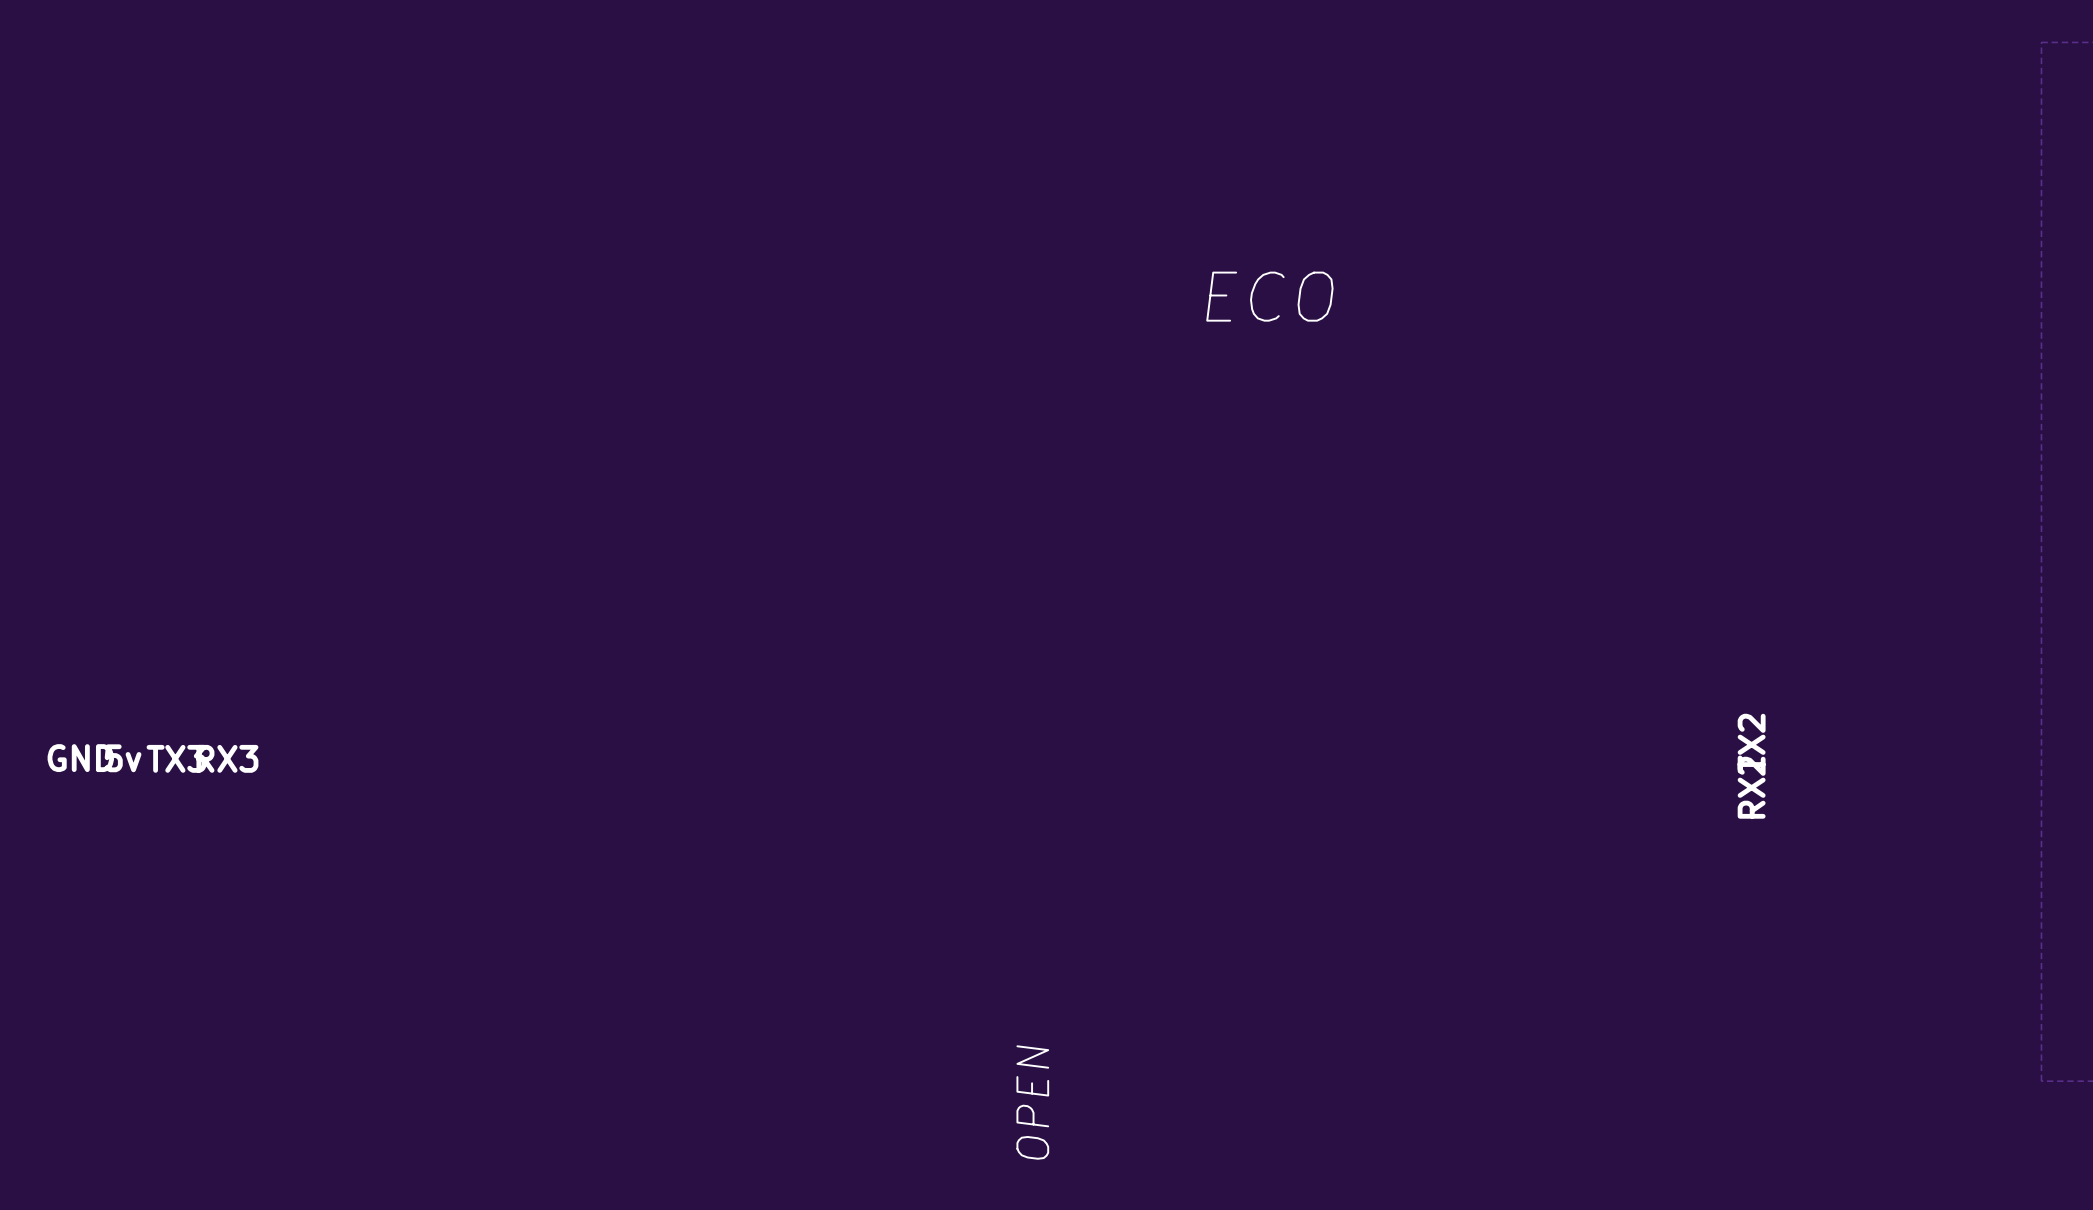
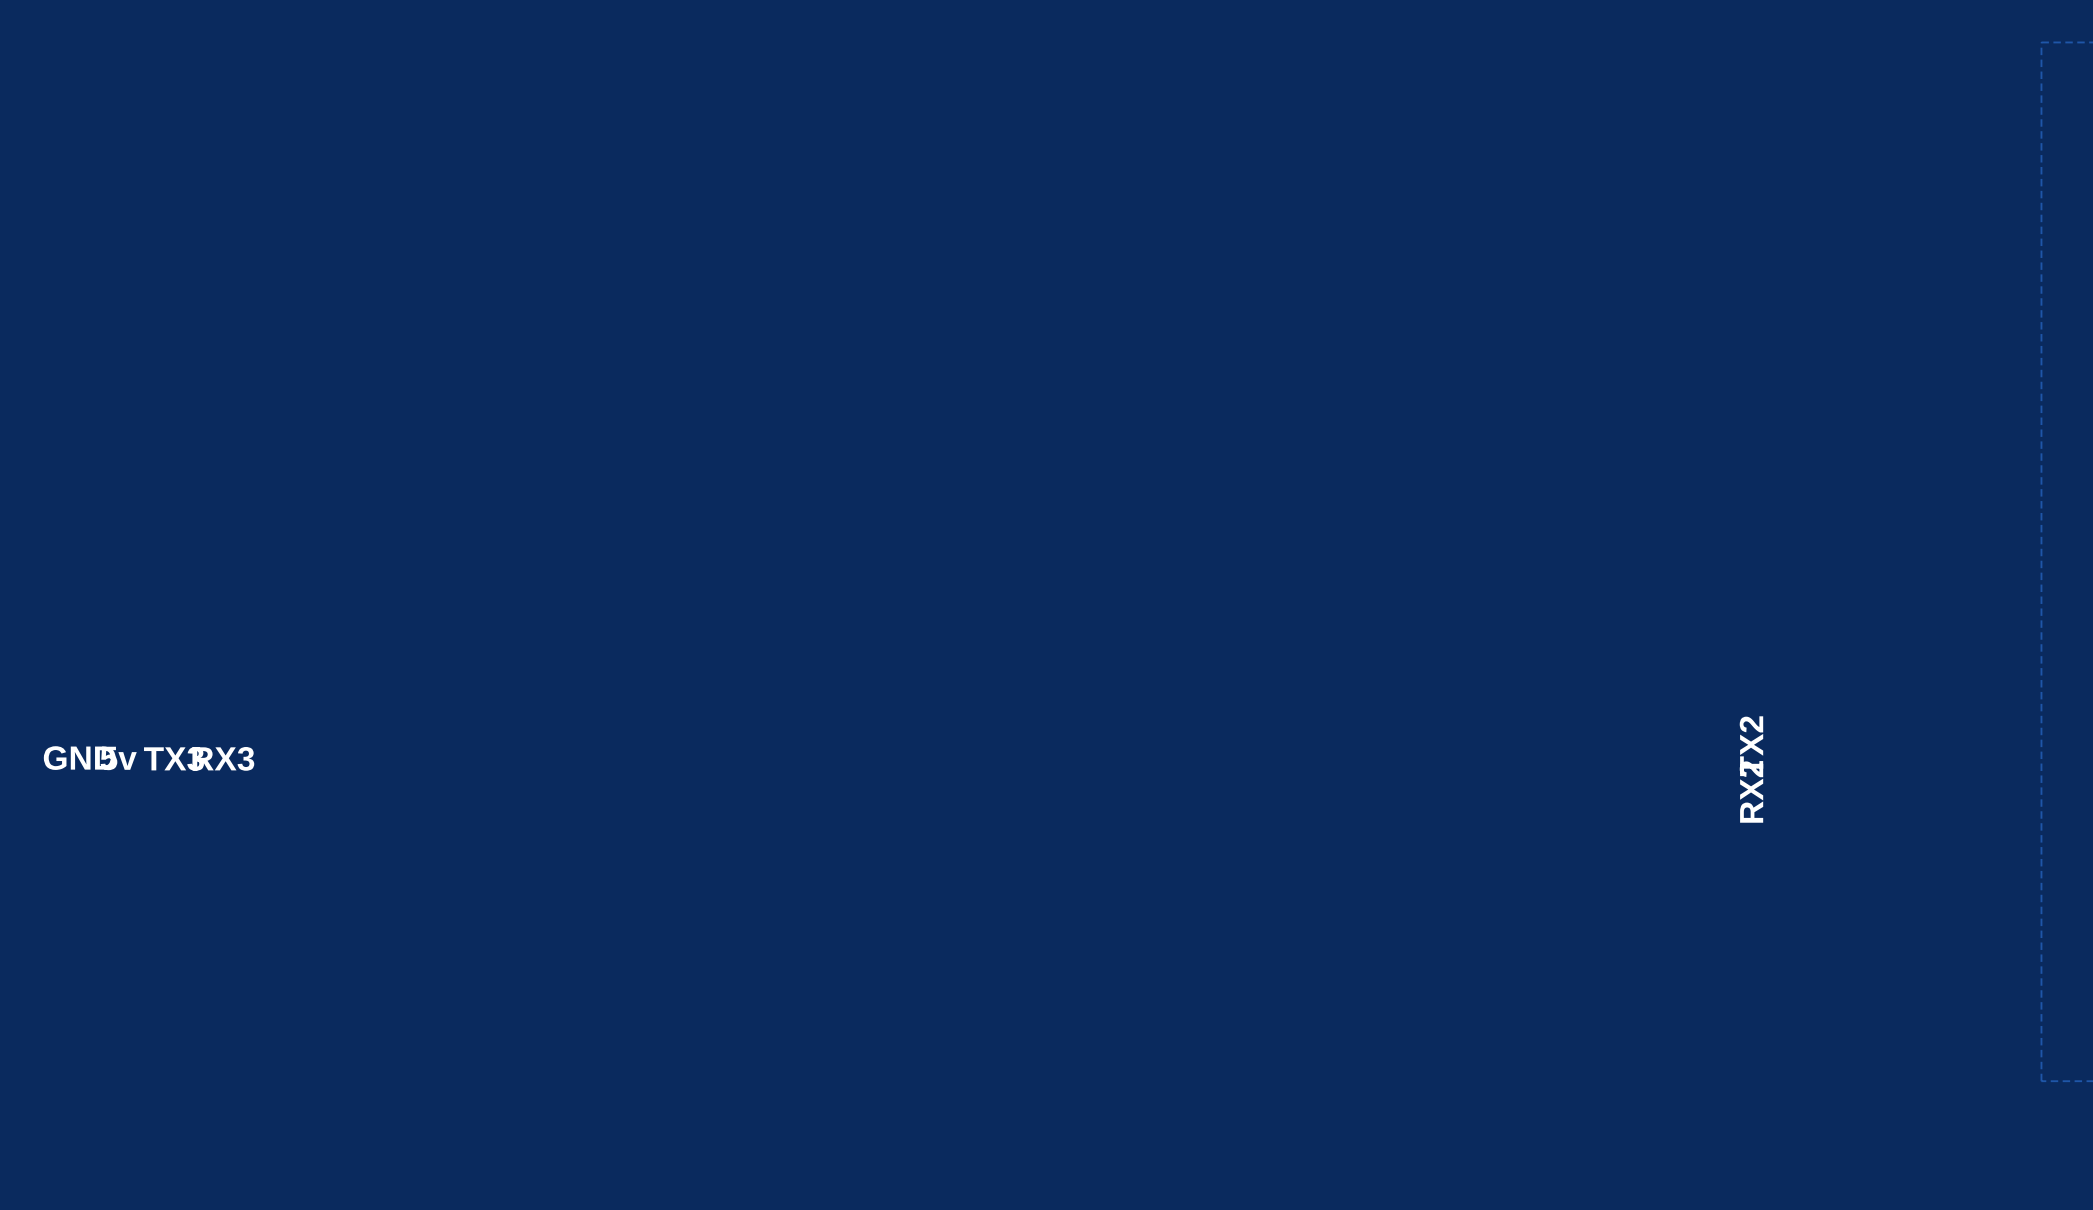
text: ECO (1269, 296) -> none
text: OPEN (1032, 1102) -> none

